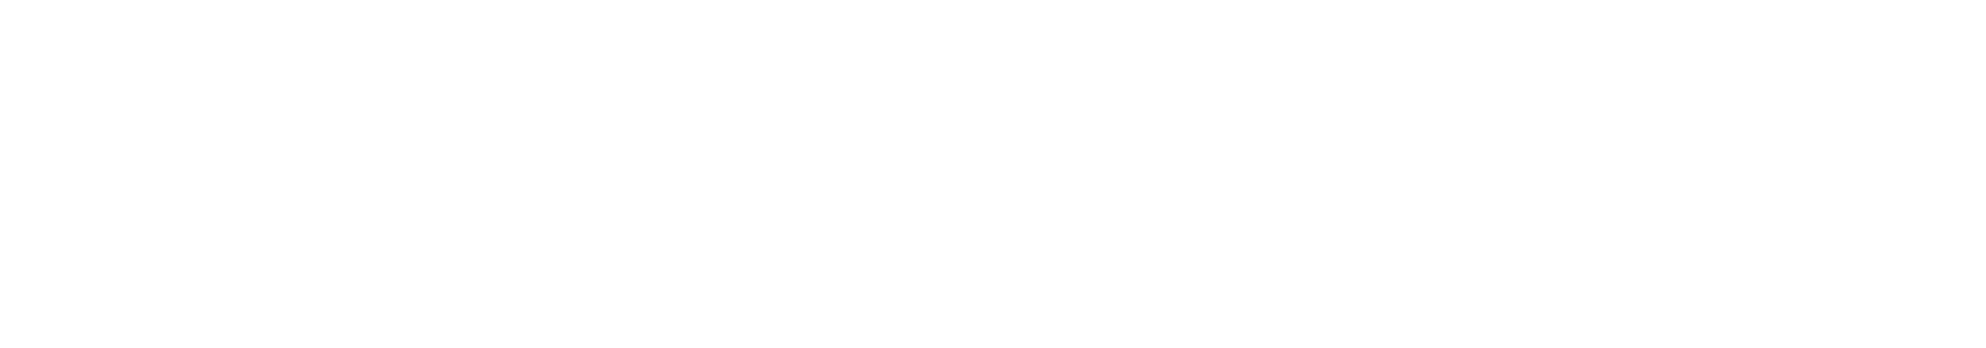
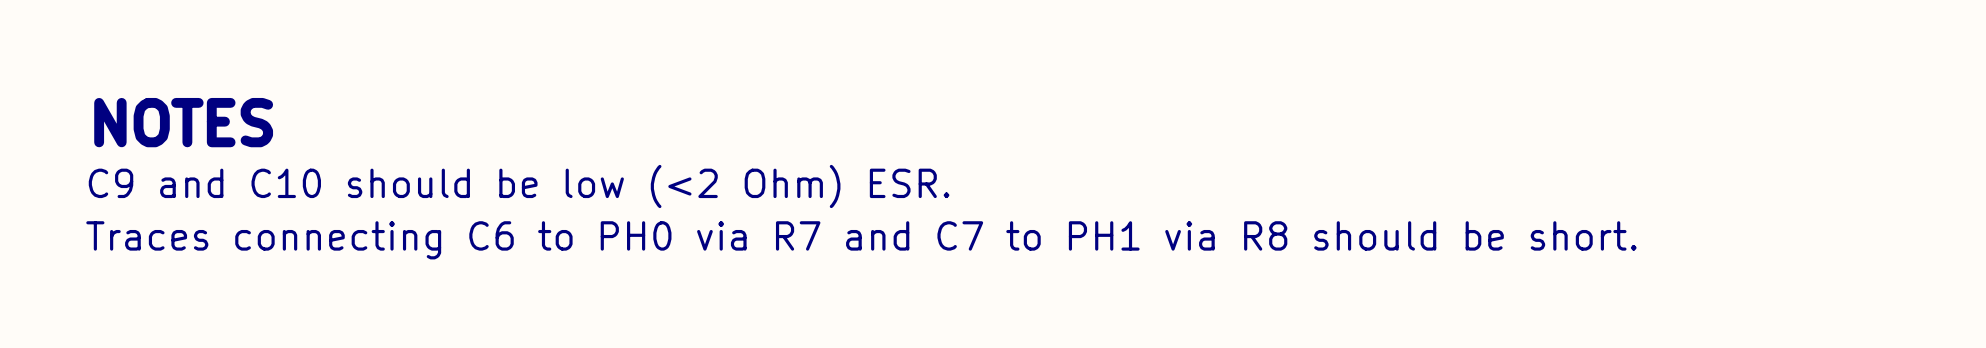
text: none -> NOTES (183, 122)
text: none -> C9 and C10 should be low (<2 Ohm) ESR. (519, 186)
text: none -> Traces connecting C6 to PH0 via R7 and C7 to PH1 via R8 should be short. (861, 240)

